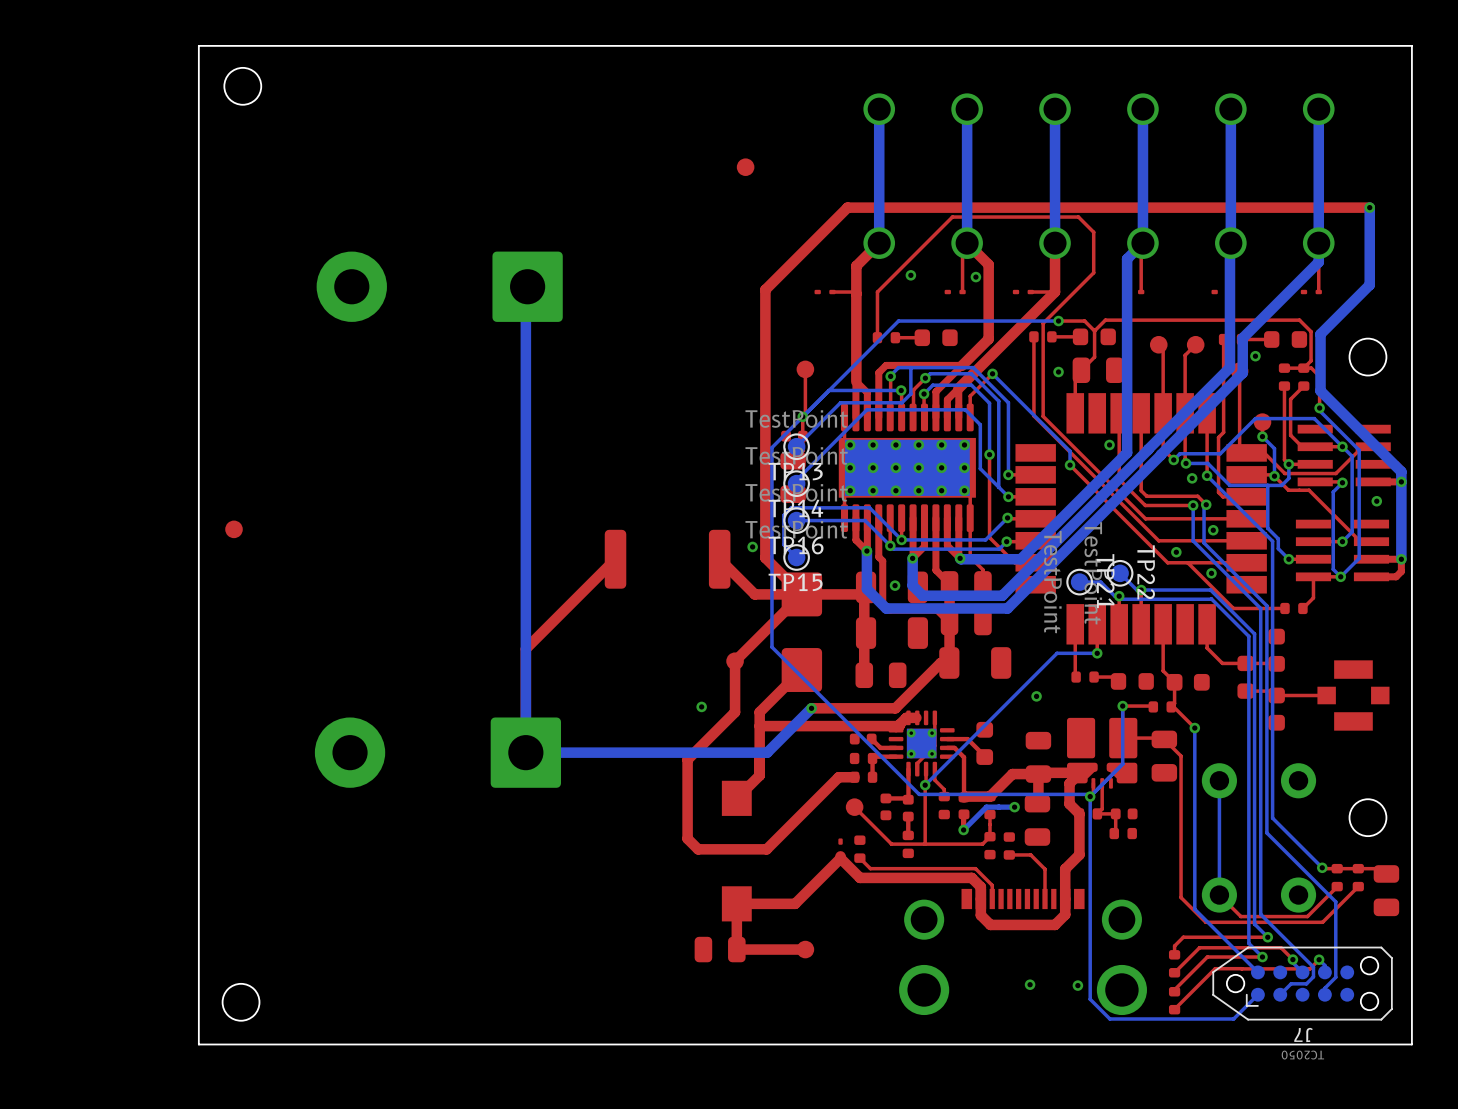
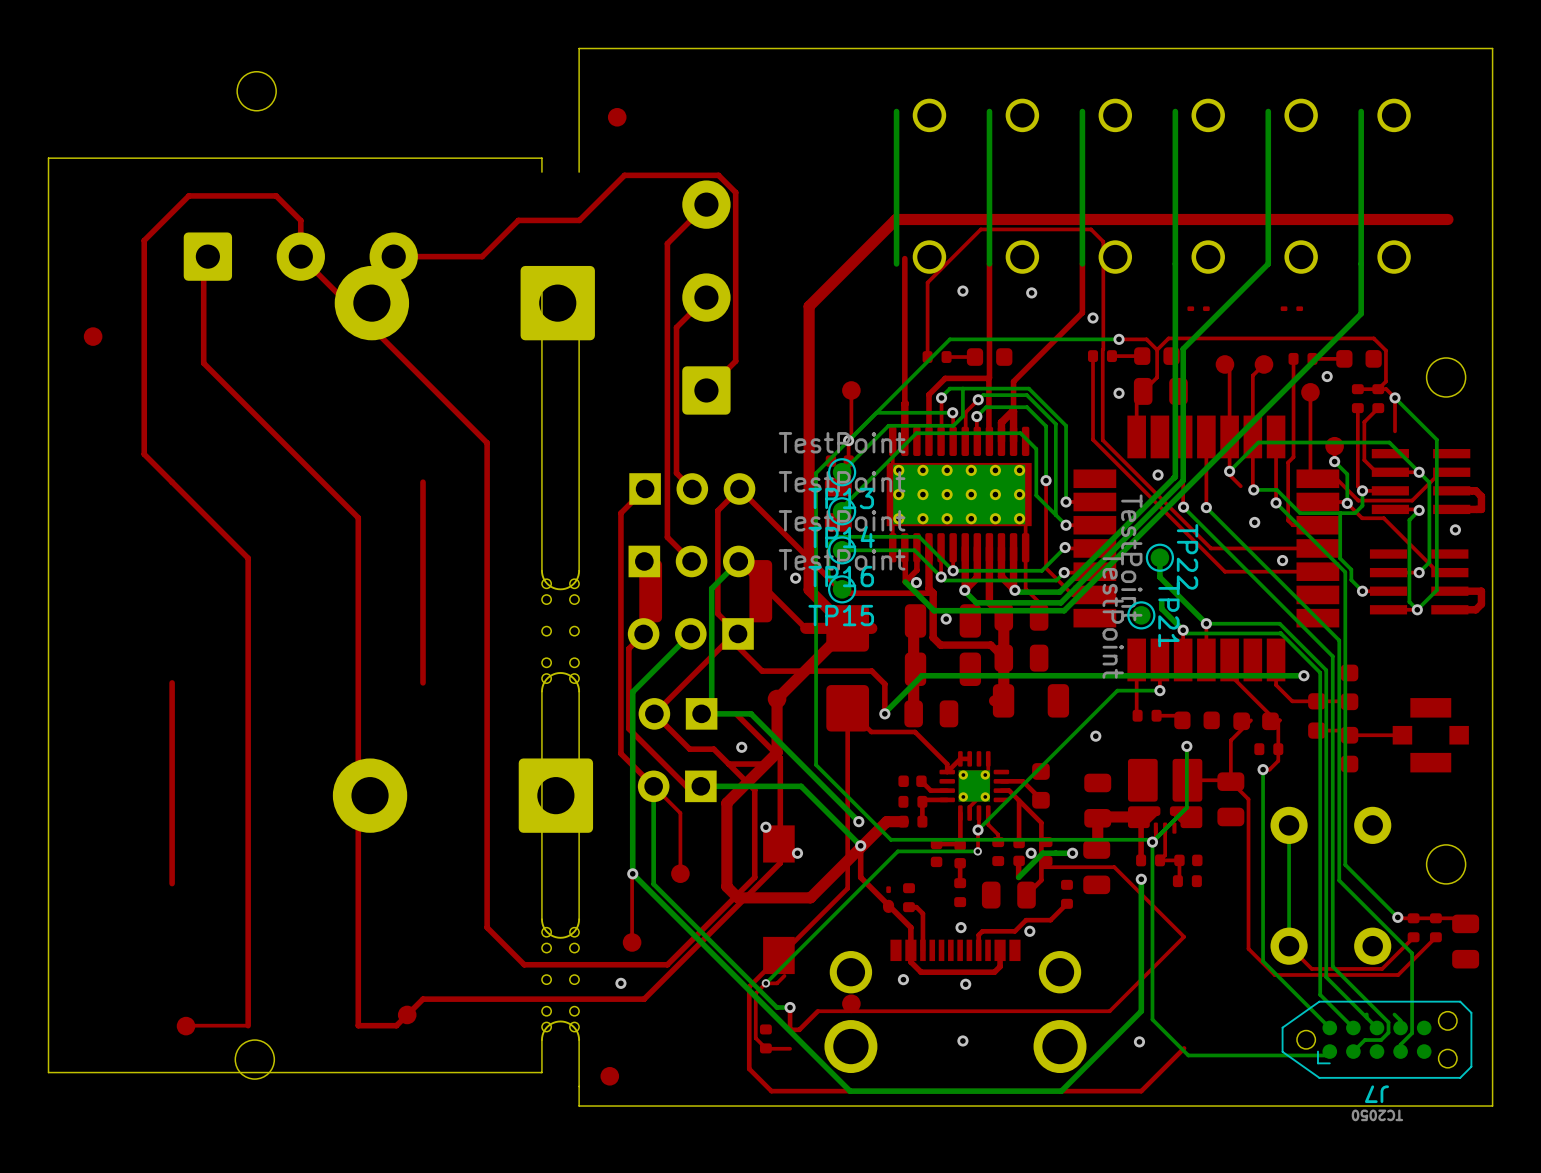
board edge: (547, 45) (198, 45) (198, 1044) (1411, 1044) -> (579, 1040) (579, 1106) (1492, 1106) (1492, 1104)
board edge: none -> (579, 48) (579, 172)
bottom track: none -> (896, 111) (896, 263)
bottom track: none -> (989, 111) (989, 263)
bottom track: none -> (1082, 111) (1082, 263)
bottom track: none -> (1175, 111) (1175, 476) (1059, 592) (1014, 592)
bottom track: none -> (1268, 111) (1268, 263) (1183, 348) (1183, 480) (1060, 602) (976, 602) (964, 591)
bottom track: none -> (1361, 111) (1361, 313) (1064, 610) (934, 610) (905, 581)
bottom track: (879, 109) (879, 243) -> none
bottom track: (967, 109) (967, 243) -> none
bottom track: (1055, 109) (1055, 243) -> none
bottom track: (1142, 109) (1142, 243) (1127, 258) (1127, 452) (1020, 559) (960, 558) -> none
bottom track: (1230, 109) (1229, 367) (1002, 595) (922, 595) (912, 585) (912, 558) -> none
bottom track: (1318, 109) (1318, 262) (1242, 338) (1242, 372) (1007, 608) (886, 608) (866, 589) (866, 551) -> none
board edge: none -> (541, 172) (541, 158) (48, 158) (48, 1072) (541, 1072) (541, 1040)
part position: (745, 167) -> (617, 117)
top track: none -> (706, 204) (667, 243) (667, 537) (691, 561)
bottom track: (1369, 207) (1369, 284) (1320, 334) (1320, 390) (1401, 471) (1401, 559) -> none
via: (1369, 207) -> none
top track: (952, 217) (877, 292) -> (1006, 229) (980, 229) (927, 282) (927, 308)
top track: (1032, 217) (1078, 217) (1093, 232) (1093, 272) (1043, 323) (1043, 330) -> (1091, 229) (1103, 241) (1102, 349)
top track: none -> (203, 255) (203, 363) (358, 517) (358, 1025) (396, 1025) (423, 999) (644, 999) (780, 863) (780, 758) (736, 713)
part: none -> (300, 256)
top track: none -> (393, 256) (482, 256) (518, 220) (579, 220) (624, 175) (718, 175) (735, 192) (735, 361) (706, 390)
top track: (879, 243) (856, 266) (856, 381) (867, 392) (867, 417) -> none
top track: (1055, 243) (1055, 292) -> none
top track: (1142, 243) (1141, 244) (1141, 292) -> none
top track: (1318, 243) (1318, 292) -> none
top track: none -> (904, 258) (904, 439)
top track: none -> (989, 263) (988, 378)
board edge: none -> (541, 292) (541, 570)
board edge: none -> (579, 292) (579, 570)
top track: none -> (706, 297) (676, 327) (676, 473) (692, 488)
part: none -> (706, 297)
bottom track: (527, 286) (525, 288) (525, 752) (767, 752) (811, 708) -> none
part: (825, 292) -> none
top track: (832, 292) (854, 292) (856, 293) -> none
part: (955, 292) -> none
top track: (962, 292) (962, 247) (967, 243) (988, 264) (988, 339) (961, 365) -> none
part: (1023, 292) -> none
top track: (1055, 292) (958, 388) -> (1082, 263) (1082, 312) (1013, 381) (1013, 411)
top track: (1055, 292) (1030, 292) -> none
part: (1311, 292) -> none
via: none -> (1093, 318)
part: none -> (93, 336)
top track: none -> (988, 378) (989, 439)
top track: none -> (988, 378) (945, 378) (928, 394) (928, 439)
top track: (961, 365) (886, 365) (878, 372) (878, 417) -> none
top track: (961, 365) (935, 391) (935, 417) -> none
top track: (992, 373) (970, 396) (970, 417) -> none
bottom track: (992, 373) (1070, 451) (1070, 465) -> none
via: (992, 373) -> none
bottom track: (1319, 408) (1319, 410) (1359, 450) -> (1395, 397) (1436, 439) (1436, 475)
via position: (1319, 408) -> (1395, 397)
bottom track: (1255, 418) (1220, 453) (1179, 453) (1173, 459) -> (1327, 442) (1258, 442) (1229, 471)
via position: (1109, 444) -> (1158, 475)
top track: none -> (423, 482) (423, 682)
via position: (1173, 459) -> (1229, 471)
top track: none -> (645, 488) (620, 513) (620, 753) (680, 813) (680, 873)
part: none -> (692, 488)
top track: (1070, 465) (1167, 562) (1246, 562) -> none
via: (1070, 465) -> none
via: (1192, 478) -> none
top track: (1119, 479) (1145, 505) (1193, 505) -> none
via: none -> (1183, 507)
top track: (1141, 480) (1141, 490) (1146, 496) (1197, 496) (1206, 504) -> none
via: none -> (1206, 507)
via: (1401, 481) -> none
via: none -> (1254, 522)
bottom track: (1206, 504) (1204, 506) (1204, 542) -> (1206, 507) (1272, 574)
via: (1206, 504) -> none
bottom track: (1193, 505) (1193, 540) (1260, 608) (1260, 620) -> (1183, 507) (1332, 656)
via: (1193, 505) -> none
top track: (867, 518) (866, 551) (855, 540) (855, 518) -> none
top track: none -> (916, 549) (916, 570) (905, 581) (905, 549)
part: (234, 529) -> none
top track: none -> (644, 561) (644, 633) (628, 648) (628, 728) (686, 786) (700, 786)
part: none -> (691, 561)
bottom track: none -> (738, 561) (711, 588) (711, 703) (701, 713) (751, 713) (858, 821)
via: (1176, 552) -> none
top track: (615, 559) (525, 648) (525, 752) -> none
top track: (719, 559) (754, 594) (762, 594) -> (738, 561) (805, 628)
via: (1401, 559) -> none
top track: none -> (931, 593) (843, 593) (739, 488) (717, 510) (717, 613) (738, 633)
top track: (1187, 562) (1233, 608) (1284, 608) -> none
bottom track: (1120, 573) (1136, 590) (1141, 590) -> (1159, 557) (1159, 577) (1206, 623)
TP22 position: (1120, 573) -> (1159, 557)
via: (1211, 573) -> none
top track: (1313, 576) (1313, 597) (1302, 608) -> none
bottom track: (1079, 582) (1100, 582) (1114, 596) (1119, 596) -> (1161, 602) (1161, 608) (1183, 630)
top track: (866, 587) (859, 594) (824, 594) -> none
part: none -> (560, 631)
bottom track: none -> (690, 633) (632, 692) (632, 873) (850, 1091) (1061, 1091) (1141, 1011) (1141, 879)
part: none -> (690, 633)
top track: none -> (738, 633) (738, 646) (762, 671) (871, 671) (884, 684) (884, 713)
top track: none -> (738, 633) (734, 633) (654, 713) (689, 749) (713, 749) (754, 790) (754, 877) (667, 964) (524, 964) (487, 927) (487, 442) (300, 256) (300, 220) (276, 195) (188, 195) (144, 240) (144, 454) (248, 558) (248, 1025) (186, 1026)
part: (1293, 608) -> none
top track: (1163, 637) (1163, 670) (1174, 682) (1174, 703) (1171, 706) (1173, 706) (1194, 728) -> (1229, 674) (1275, 720) (1279, 720) (1278, 760) (1269, 769) (1263, 769)
bottom track: none -> (1303, 675) (922, 675) (884, 713)
via: none -> (1303, 675)
top track: none -> (172, 682) (172, 883)
bottom track: (771, 647) (919, 794) -> (816, 684) (816, 764) (890, 839) (971, 839)
board edge: none -> (541, 691) (541, 919)
board edge: none -> (579, 691) (579, 919)
top track: (940, 662) (895, 708) (811, 708) -> none
top track: (801, 670) (759, 712) (759, 775) (736, 798) -> none
part: none -> (677, 713)
via: none -> (884, 713)
top track: none -> (1250, 720) (1230, 740) (1230, 781)
top track: (1122, 706) (1153, 706) -> none
part position: (1162, 706) -> (1268, 749)
via: (811, 708) -> none
top track: (916, 717) (906, 717) (899, 726) (759, 726) -> none
top track: none -> (765, 764) (728, 764)
top track: none -> (947, 772) (947, 764) (915, 731) (871, 731) (847, 708) (847, 888) (749, 986) (749, 1068) (771, 1091) (1141, 1091) (1184, 1048)
bottom track: none -> (653, 786) (653, 884) (776, 1007) (790, 1007)
part: none -> (677, 786)
bottom track: none -> (700, 786) (801, 786) (860, 845)
top track: none -> (1019, 800) (1041, 822) (1041, 880) (1026, 895)
top track: (1079, 773) (1069, 783) (1069, 803) (1079, 813) (1079, 854) (1065, 869) (1065, 914) (1055, 924) (990, 924) (980, 915) (980, 887) (971, 877) (860, 877) (840, 858) (795, 903) (736, 903) (736, 949) (805, 949) -> (1141, 817) (1141, 860)
top track: (1038, 774) (1012, 774) (989, 796) (964, 797) -> none
via: none -> (858, 821)
via: none -> (765, 827)
top track: none -> (860, 845) (860, 877) (910, 927) (910, 961) (921, 972) (994, 972) (1000, 966) (1000, 950)
via: none -> (860, 845)
bottom track: none -> (977, 851) (897, 851) (765, 983)
via: none -> (977, 851)
top track: (925, 805) (925, 843) -> none
via: none -> (797, 853)
top track: (854, 807) (891, 844) (982, 844) (989, 836) (989, 814) -> none
part: (854, 807) -> none
top track: none -> (1041, 868) (1114, 867) (1184, 936) (1109, 1011) (817, 1011) (799, 1029) (790, 1029) (790, 1007)
top track: none -> (632, 873) (632, 942)
via: none -> (632, 873)
part: none -> (680, 873)
via position: (963, 830) -> (1031, 853)
via: none -> (1141, 879)
part: (989, 845) -> none
top track: (1009, 854) (1030, 854) (1045, 869) (1045, 899) -> (1066, 903) (1050, 920) (1026, 920) (1014, 931) (982, 931) (978, 935) (978, 950)
top track: (859, 858) (870, 868) (975, 868) (992, 885) (992, 899) -> (909, 907) (916, 907) (922, 913) (922, 950)
via: none -> (961, 927)
via: none -> (1029, 931)
part: none -> (632, 942)
top track: none -> (784, 975) (777, 983) (765, 983) (755, 993) (755, 1038) (766, 1048) (790, 1048)
bottom track: (1254, 924) (1267, 937) -> (1326, 977) (1366, 1017)
part: none -> (560, 979)
via: none -> (903, 979)
via: none -> (620, 983)
via: none -> (765, 983)
via: none -> (965, 984)
top track: (1267, 937) (1183, 937) (1174, 946) (1174, 954) -> none
via: (1267, 937) -> none
bottom track: (1248, 941) (1248, 943) (1262, 957) -> (1320, 994) (1353, 1027)
part position: (720, 949) -> (1008, 895)
part position: (1023, 951) -> (955, 1006)
via: none -> (790, 1007)
top track: (1262, 957) (1207, 957) (1174, 989) -> none
via: (1262, 957) -> none
top track: (1292, 959) (1281, 947) (1199, 947) (1174, 972) -> none
via: (1292, 959) -> none
top track: (1319, 959) (1309, 968) (1241, 968) -> none
via: (1319, 959) -> none
part: none -> (407, 1014)
part: (1174, 963) -> none
bottom track: (1090, 964) (1090, 999) (1109, 1018) (1233, 1018) (1254, 998) -> (1152, 1019) (1188, 1055) (1325, 1055)
top track: (1241, 968) (1215, 968) (1174, 1009) -> none
part: none -> (186, 1026)
part: none -> (765, 1038)
via: none -> (962, 1040)
via: (1030, 984) -> none
part: (1174, 1000) -> none
part: none -> (609, 1076)

